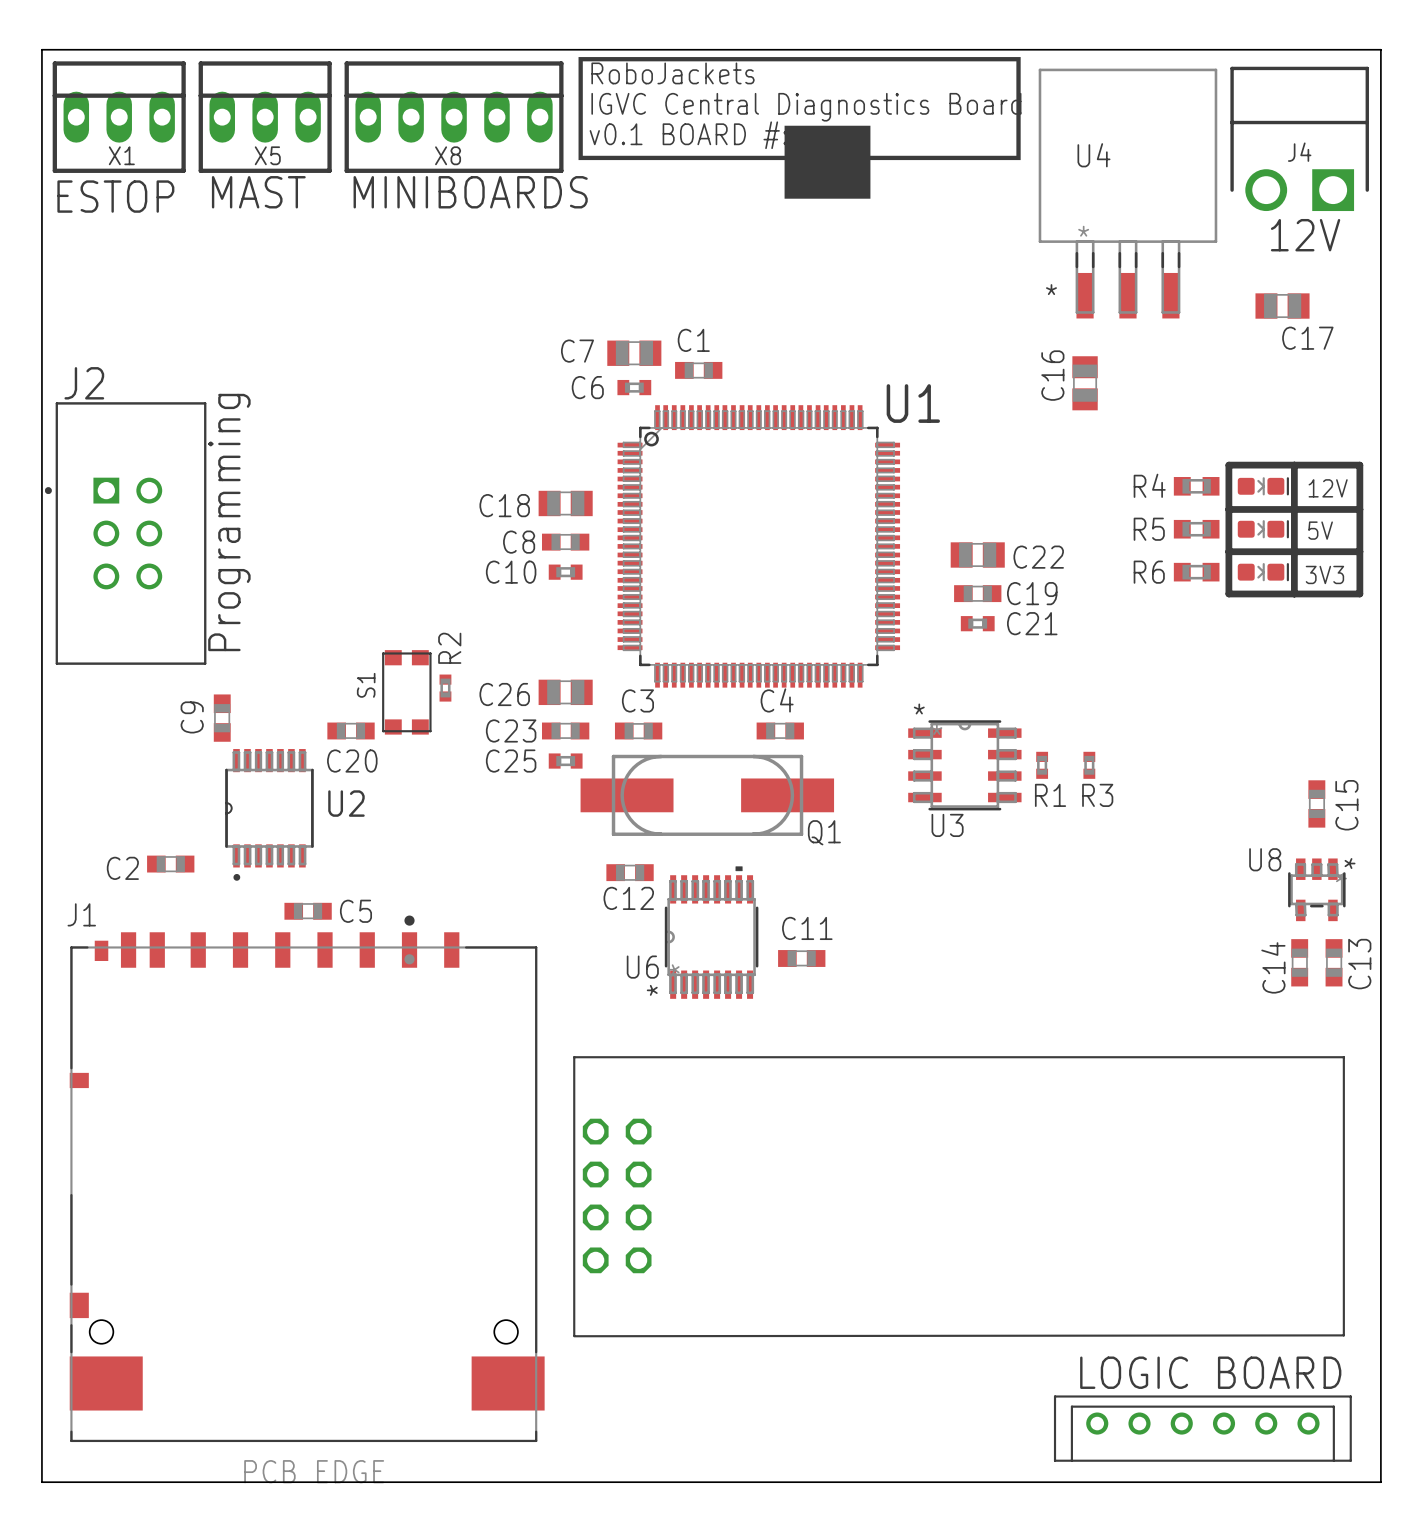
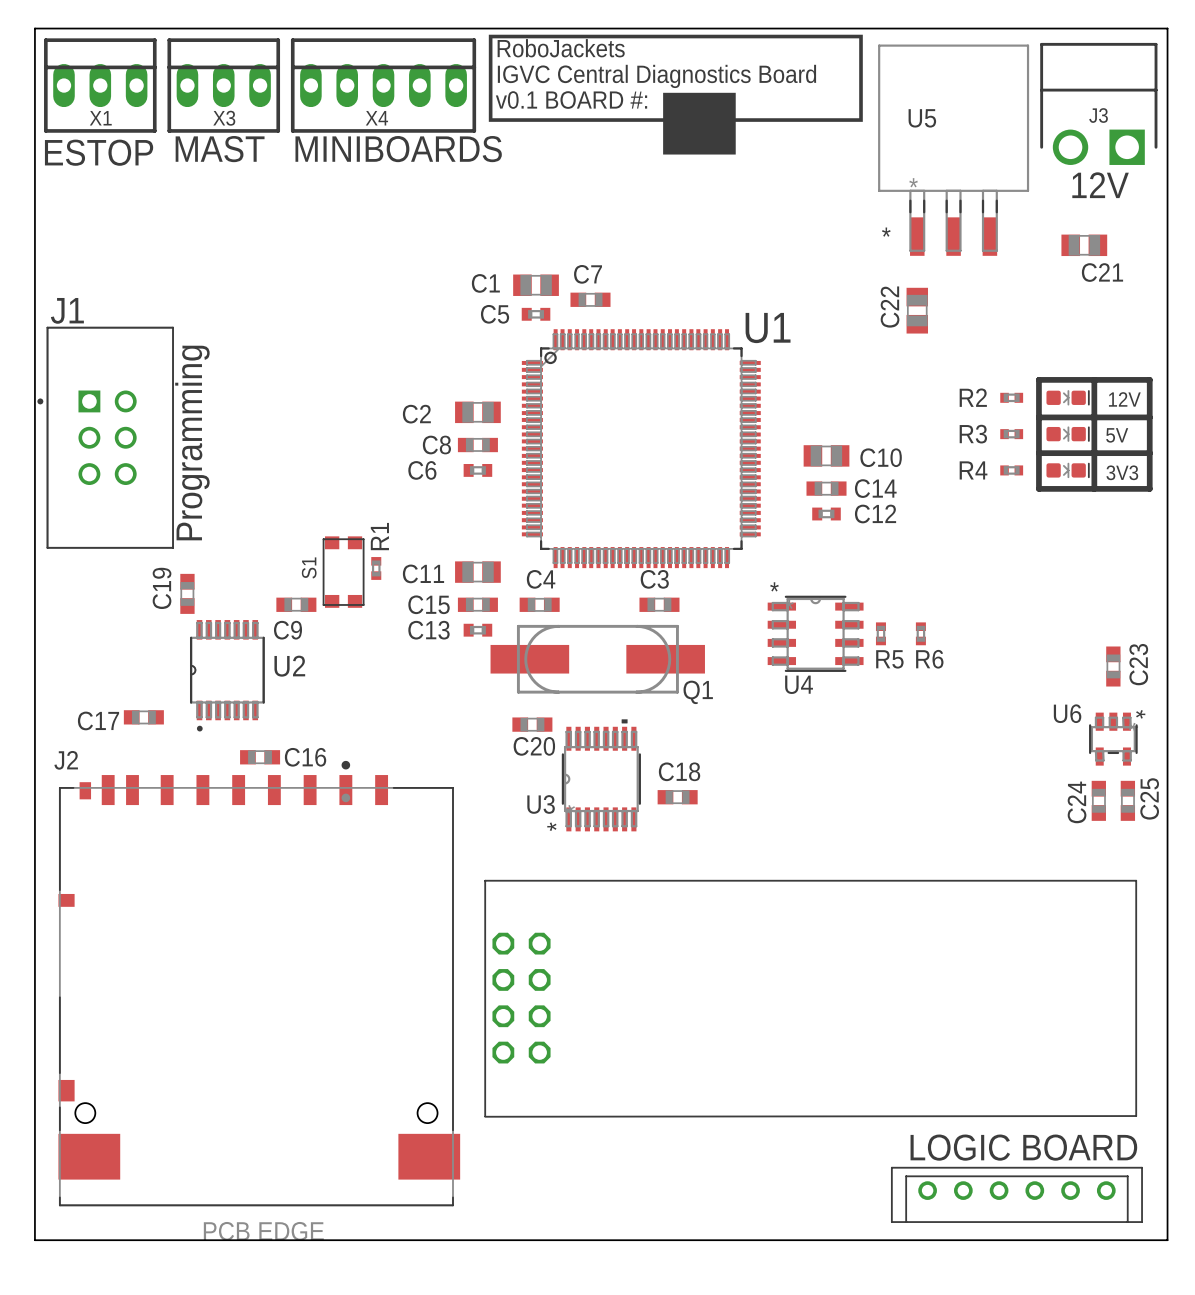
J4 name: J4 (1299, 152) -> J3 (1098, 115)
X5 name: X5 (267, 155) -> X3 (224, 118)
X8 name: X8 (448, 155) -> X4 (376, 118)
U4 name: U4 (1093, 155) -> U5 (922, 118)
C17 name: C17 (1307, 338) -> C21 (1102, 272)
C1 name: C1 (693, 340) -> C7 (588, 274)
C7 name: C7 (577, 351) -> C1 (485, 283)
C16 name: C16 (1052, 375) -> C22 (890, 307)
J2 name: J2 (84, 383) -> J1 (67, 310)
C6 name: C6 (587, 387) -> C5 (495, 314)
R4 footprint: [1173, 477, 1220, 496] -> [1000, 465, 1024, 476]
R2: none -> (1011, 397)
C18 name: C18 (504, 505) -> C2 (416, 414)
R5: (1196, 529) -> none
R3: none -> (1011, 434)
C22 name: C22 (1038, 557) -> C10 (881, 457)
C10 name: C10 (511, 572) -> C6 (422, 470)
R6: (1196, 572) -> none
C19 name: C19 (1032, 593) -> C14 (875, 488)
C21 name: C21 (1032, 623) -> C12 (875, 514)
R2 name: R2 (449, 648) -> R1 (379, 536)
C26 name: C26 (504, 694) -> C11 (423, 573)
C3 name: C3 (637, 700) -> C4 (541, 579)
C4 name: C4 (777, 700) -> C3 (654, 579)
C9 name: C9 (192, 717) -> C19 (162, 588)
C23 name: C23 (511, 730) -> C15 (429, 604)
C20 name: C20 (352, 761) -> C9 (288, 630)
C25 name: C25 (511, 761) -> C13 (428, 630)
R1 name: R1 (1050, 795) -> R5 (889, 659)
R3 name: R3 (1097, 795) -> R6 (929, 659)
C15 name: C15 (1346, 805) -> C23 (1138, 664)
U3 name: U3 (947, 825) -> U4 (799, 684)
U8 name: U8 (1265, 859) -> U6 (1067, 713)
C2 name: C2 (122, 868) -> C17 (98, 720)
C12 name: C12 (628, 898) -> C20 (534, 746)
C5 name: C5 (355, 911) -> C16 (305, 757)
J1 name: J1 (81, 914) -> J2 (66, 760)
C11 name: C11 (807, 928) -> C18 (679, 771)
C13 name: C13 (1359, 964) -> C25 (1149, 798)
U6 name: U6 (642, 967) -> U3 (541, 804)
C14 name: C14 (1273, 967) -> C24 (1077, 802)

